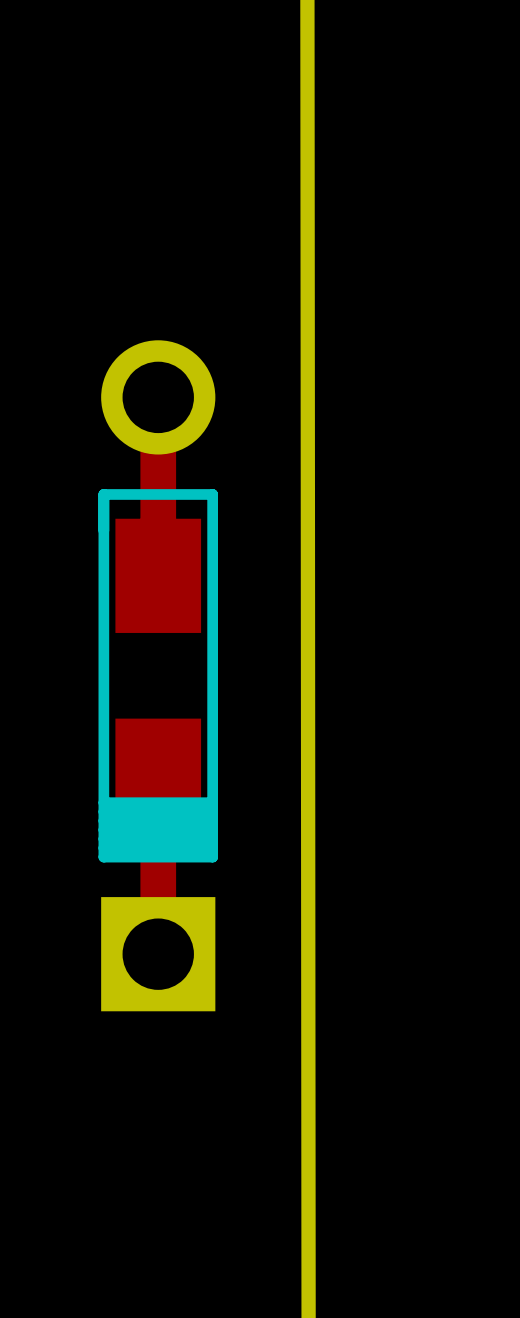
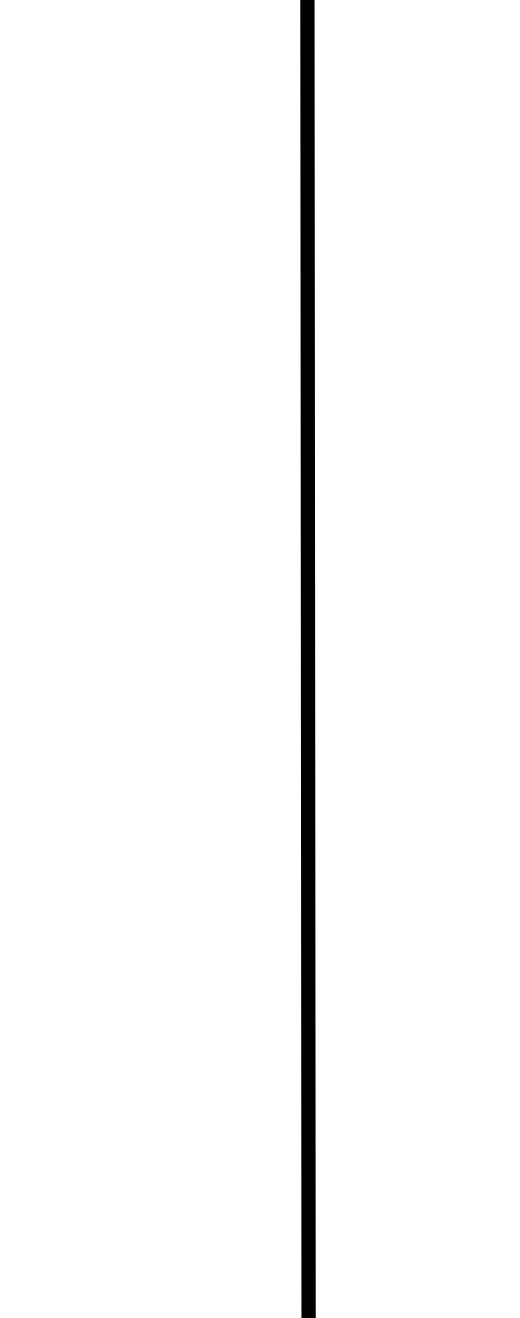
part: (158, 675) -> none

